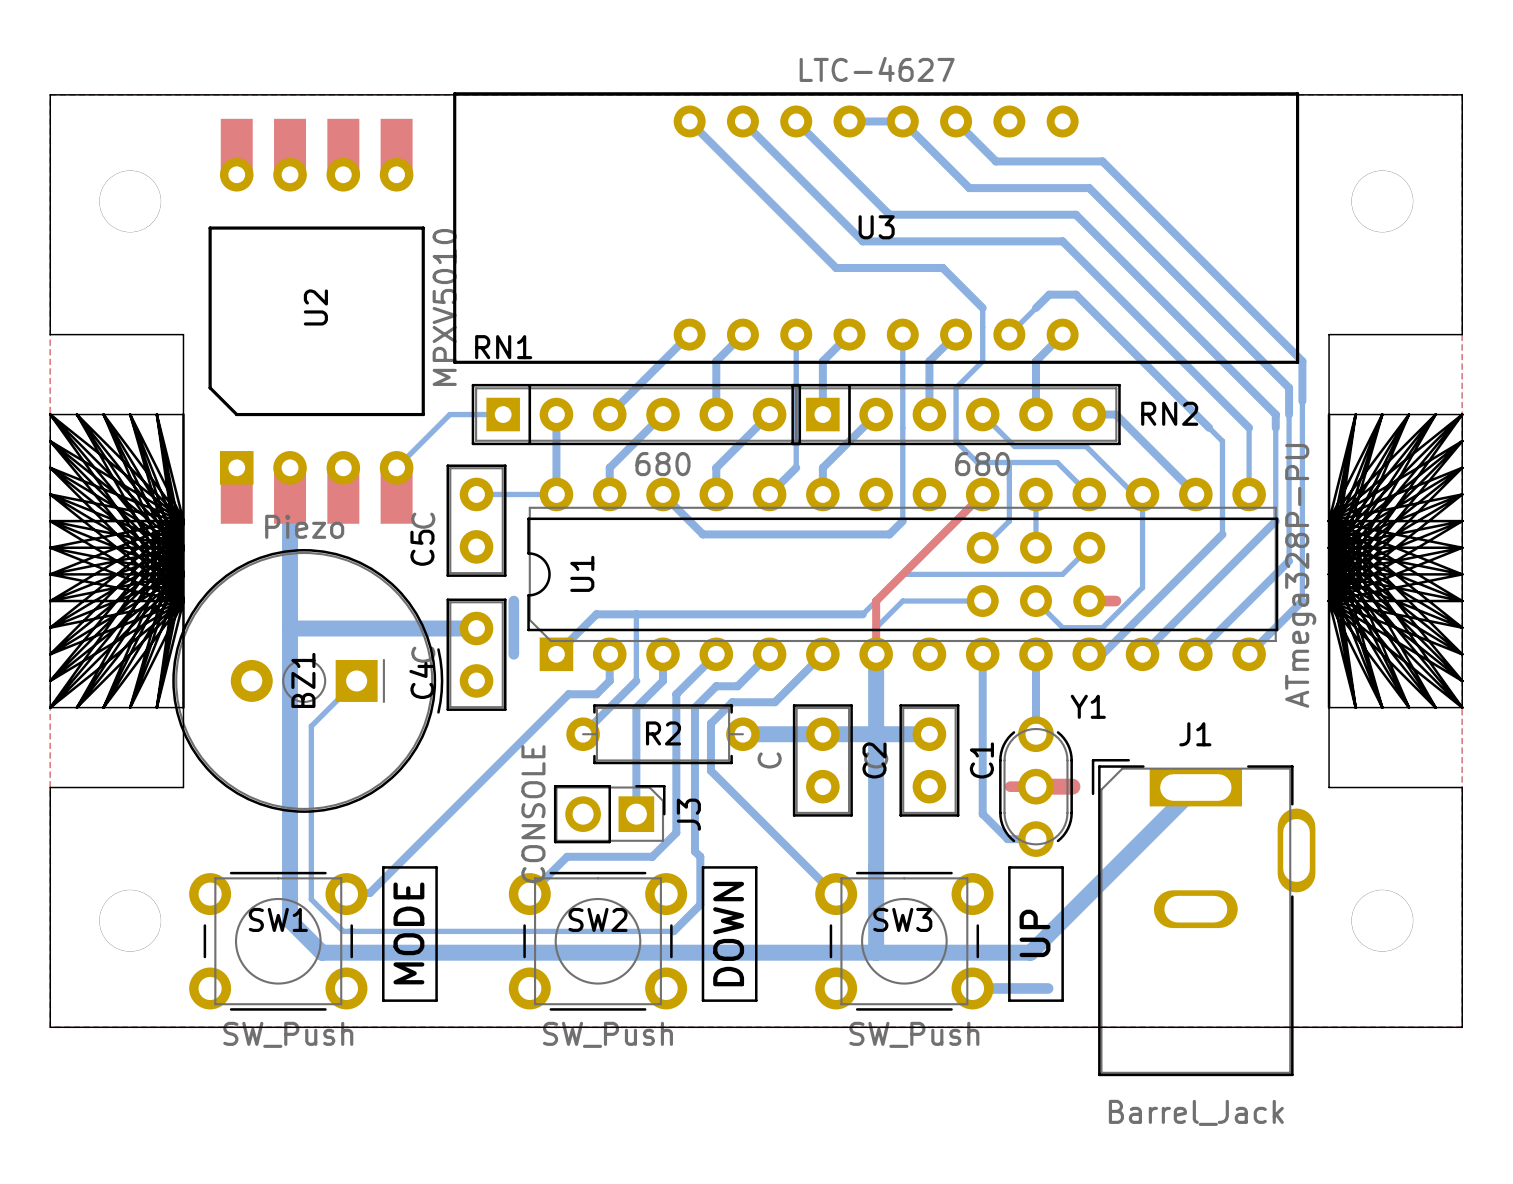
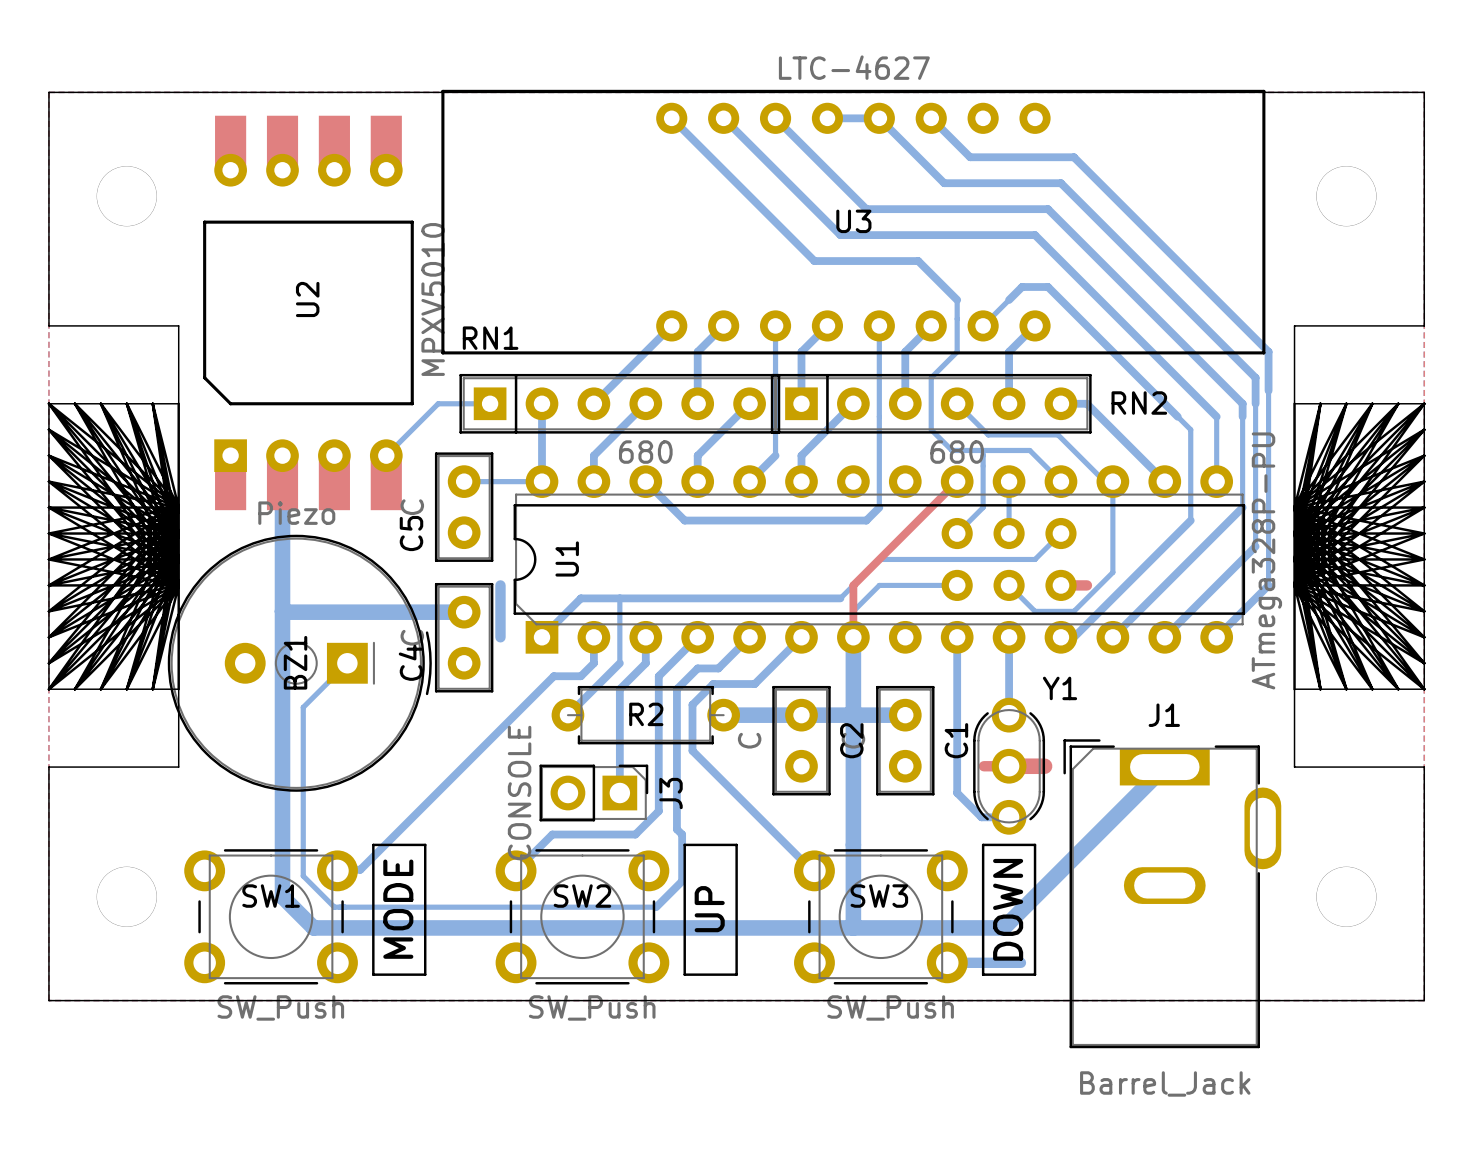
text: UP (1034, 933) -> DOWN (1008, 909)
text: DOWN (728, 934) -> UP (709, 909)

